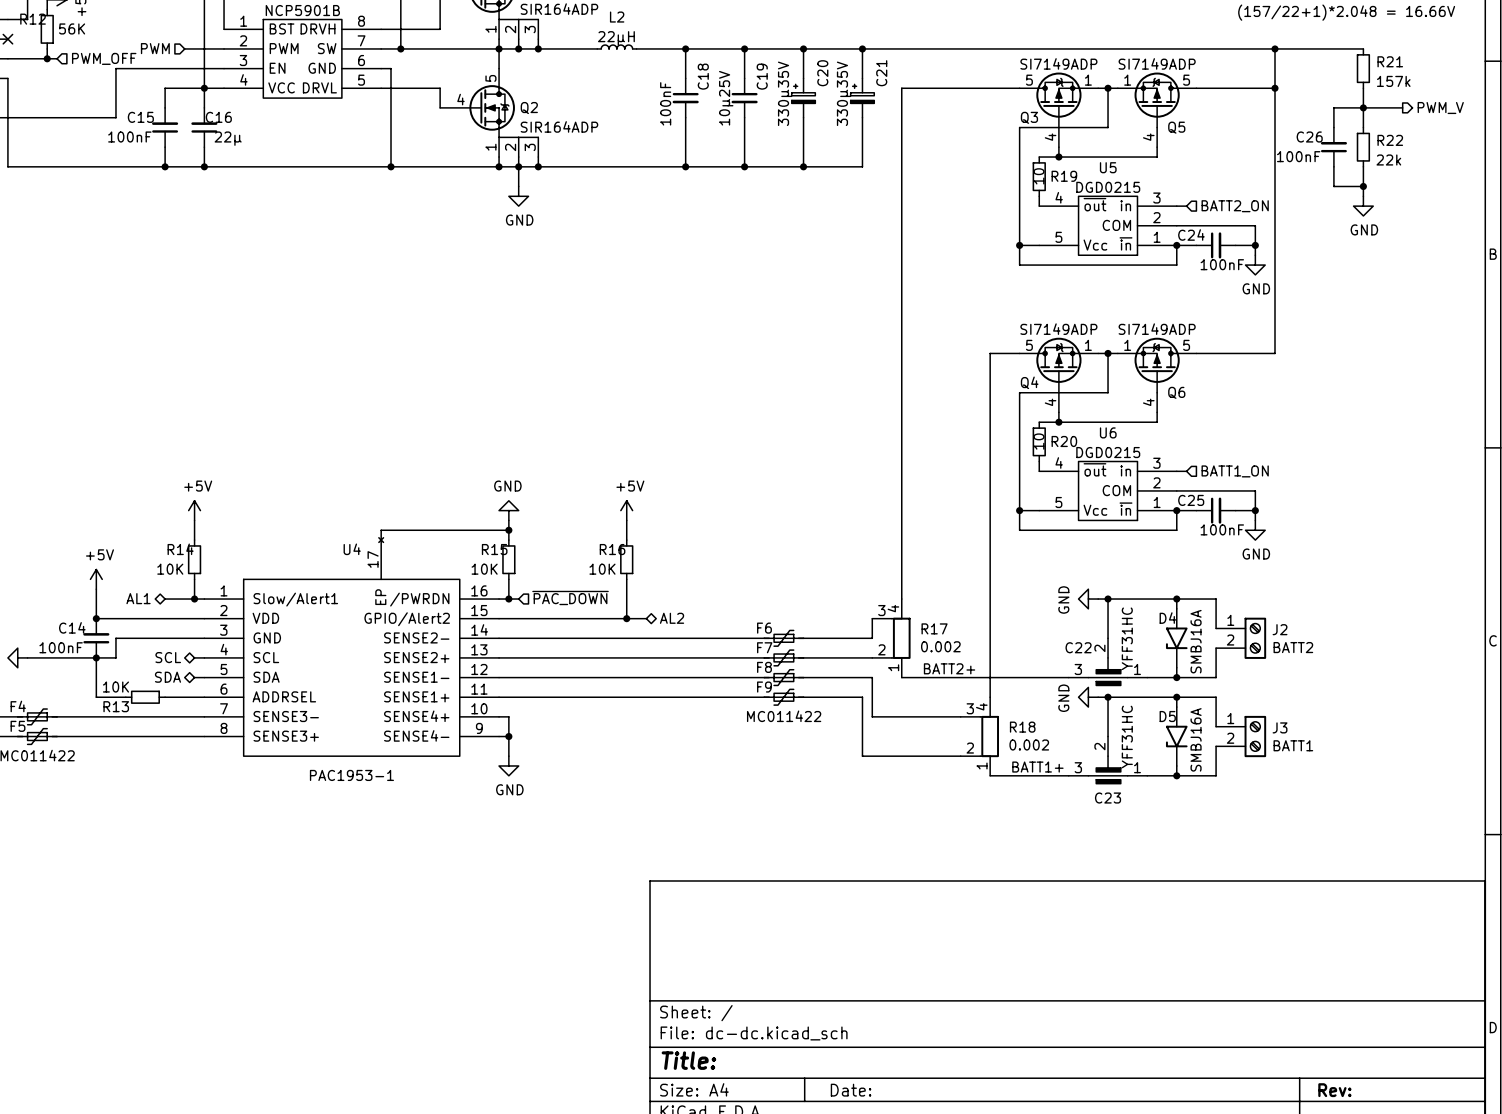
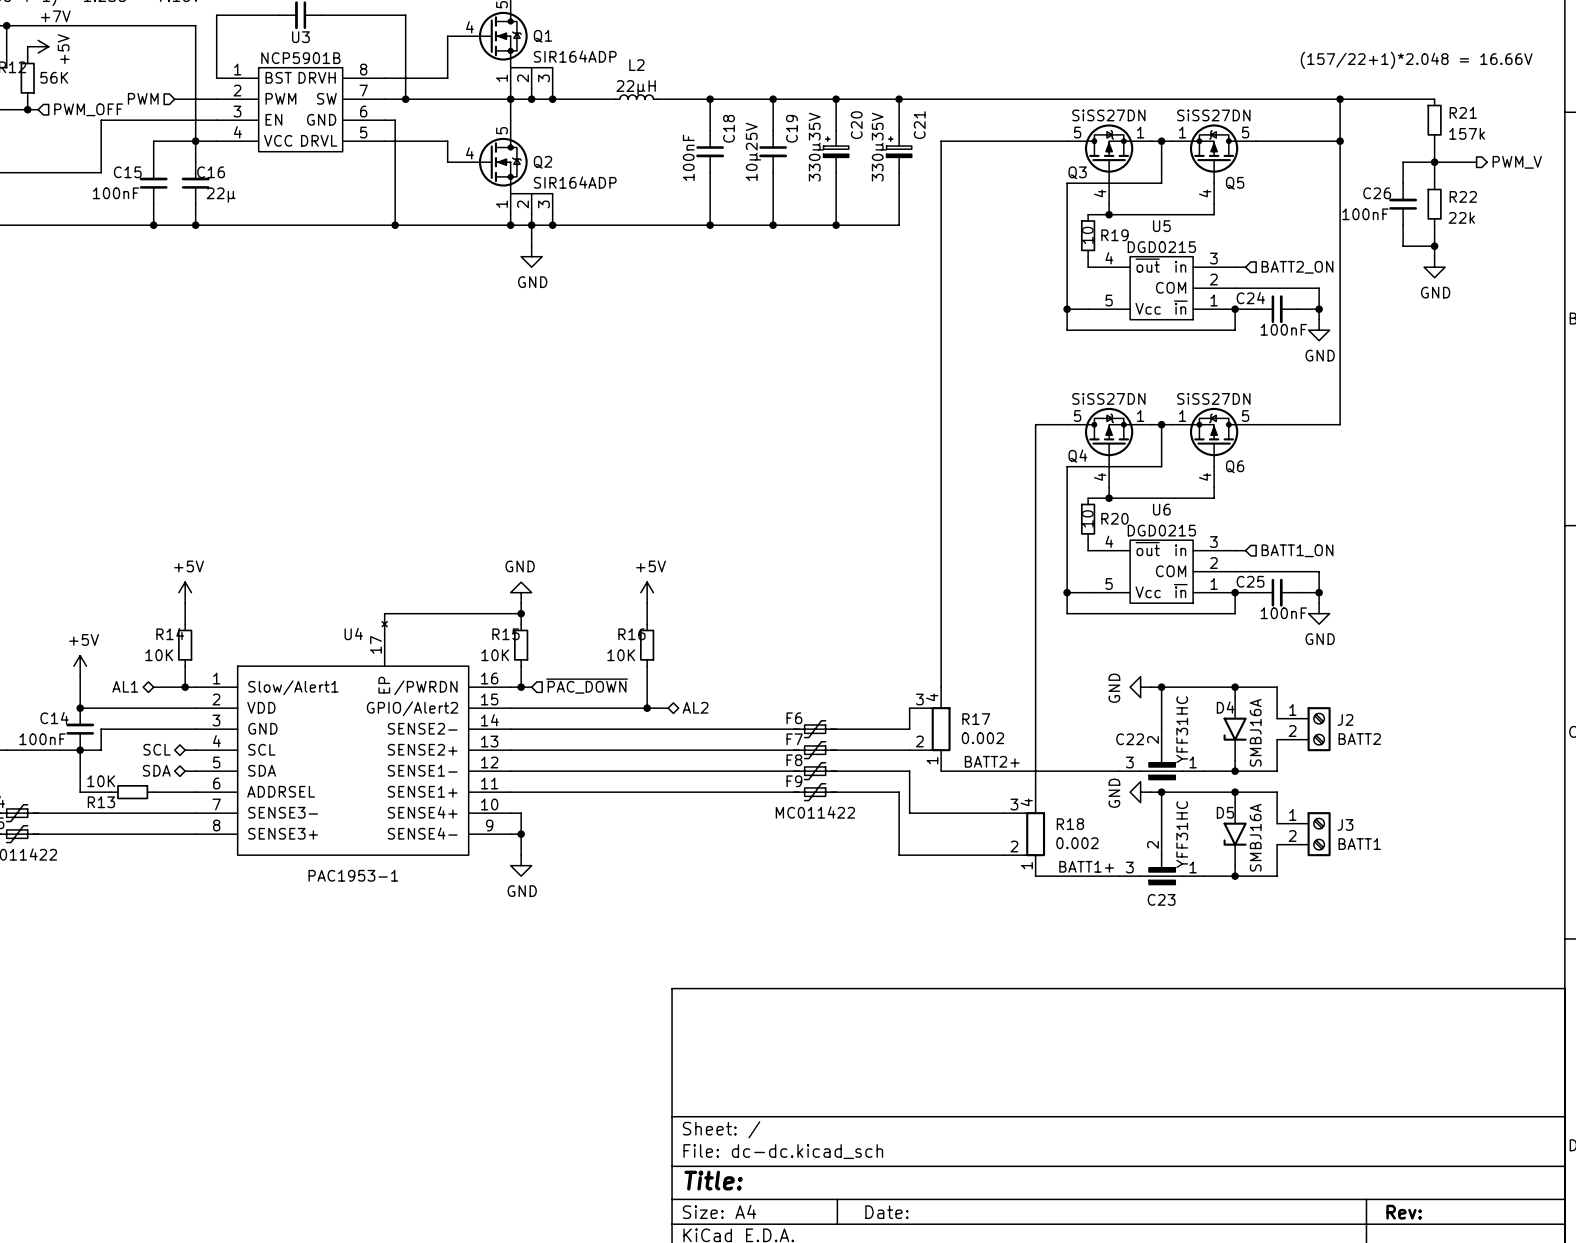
Q3 value: SI7149ADP (1058, 63) -> SiSS27DN (1108, 115)
Q5 value: SI7149ADP (1157, 63) -> SiSS27DN (1213, 115)
Q4 value: SI7149ADP (1058, 329) -> SiSS27DN (1108, 398)
Q6 value: SI7149ADP (1157, 329) -> SiSS27DN (1213, 398)

